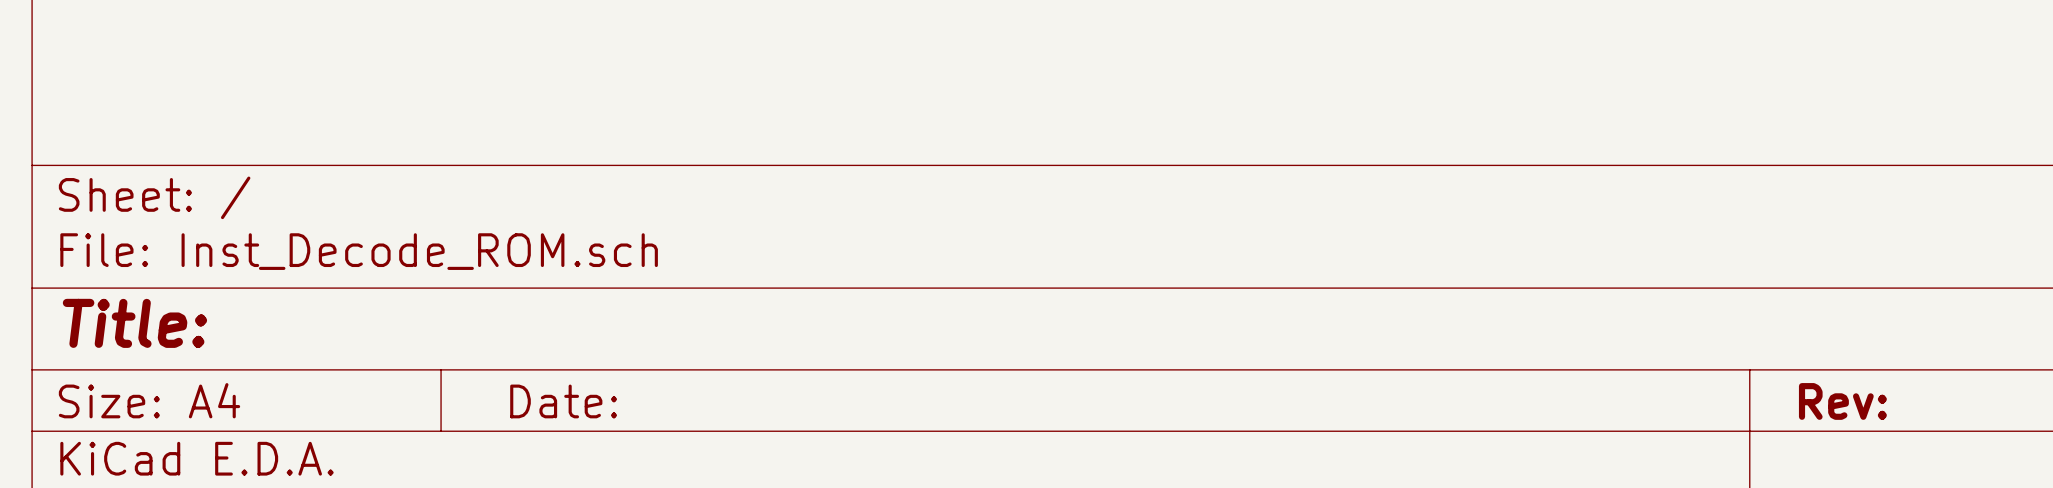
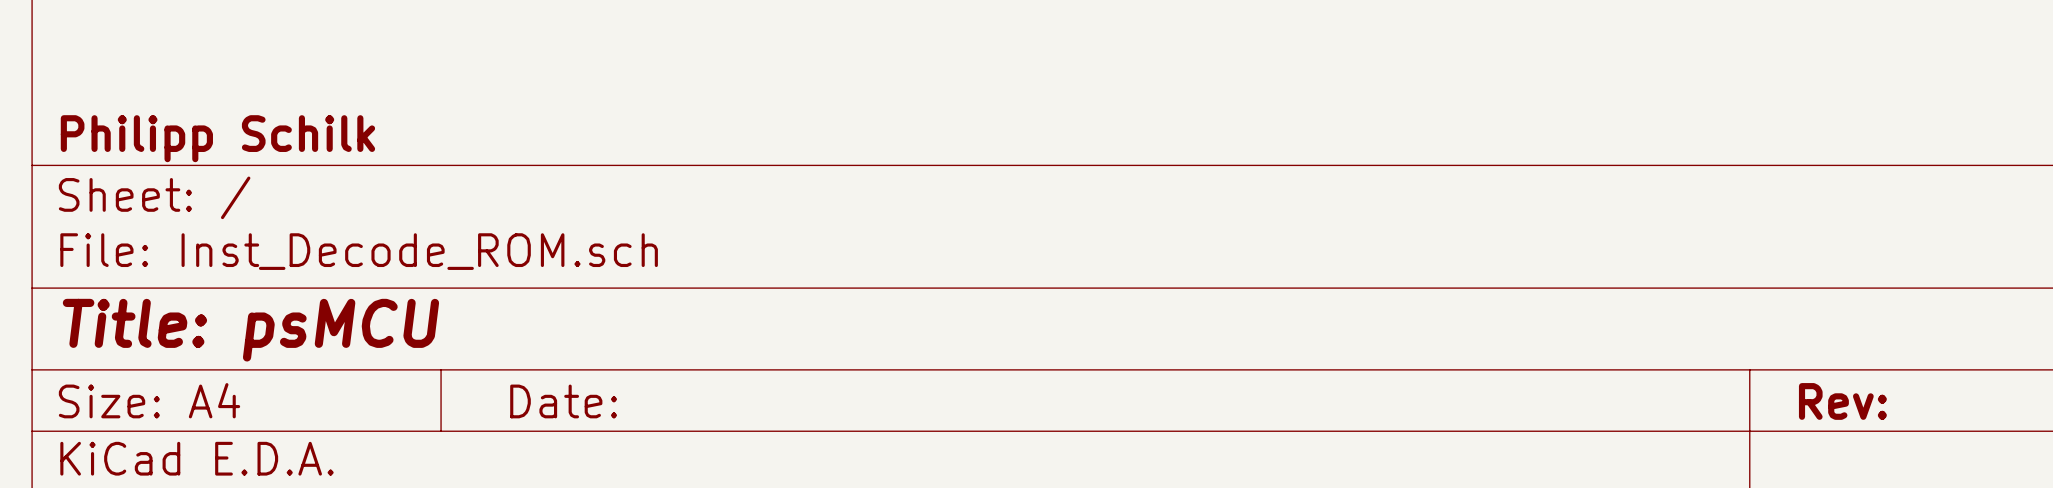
title block: none -> Philipp Schilk (217, 138)
title block: Title: (134, 323) -> Title: psMCU (250, 330)

